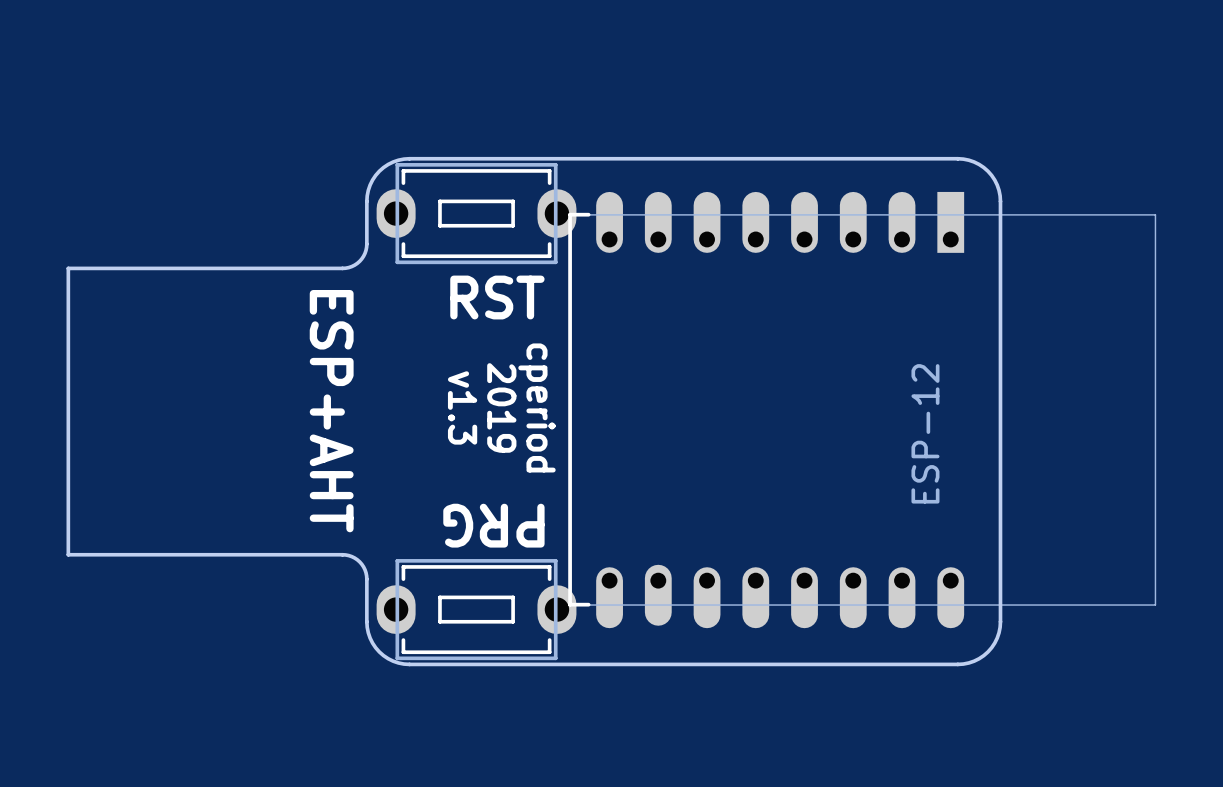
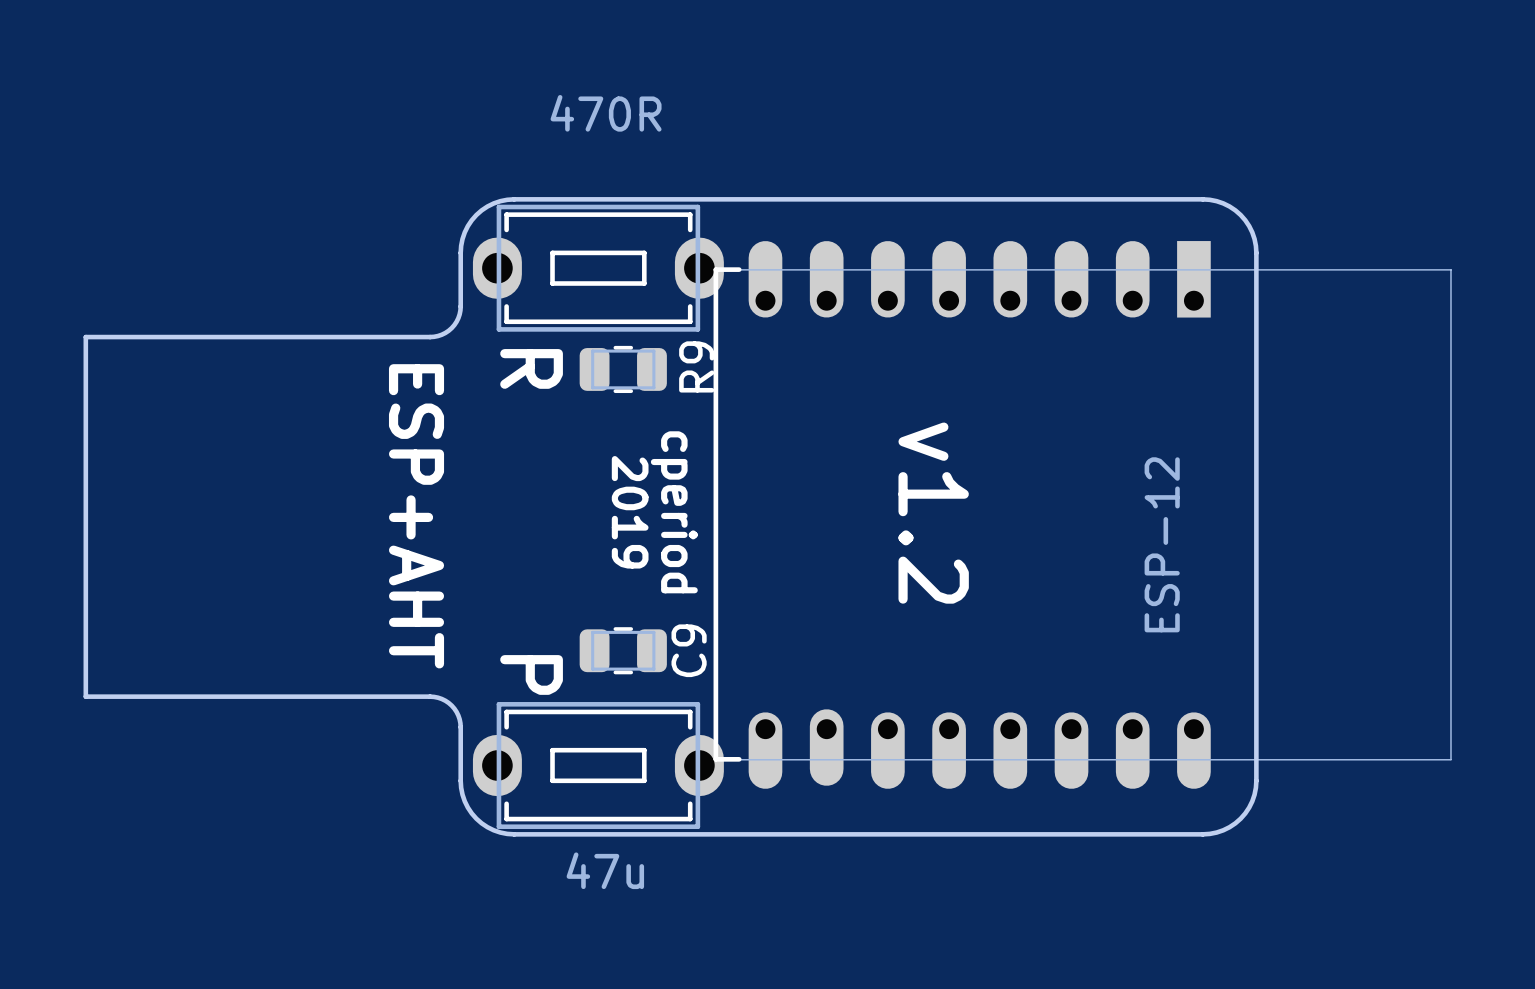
text: none -> R (531, 368)
R9: none -> 470R (623, 369)
text: RST (497, 297) -> none
text: v1.3 (462, 407) -> none
text: none -> v1.2 (933, 513)
C9: none -> 47u (623, 650)
text: PRG (493, 525) -> none
text: none -> P (531, 674)

